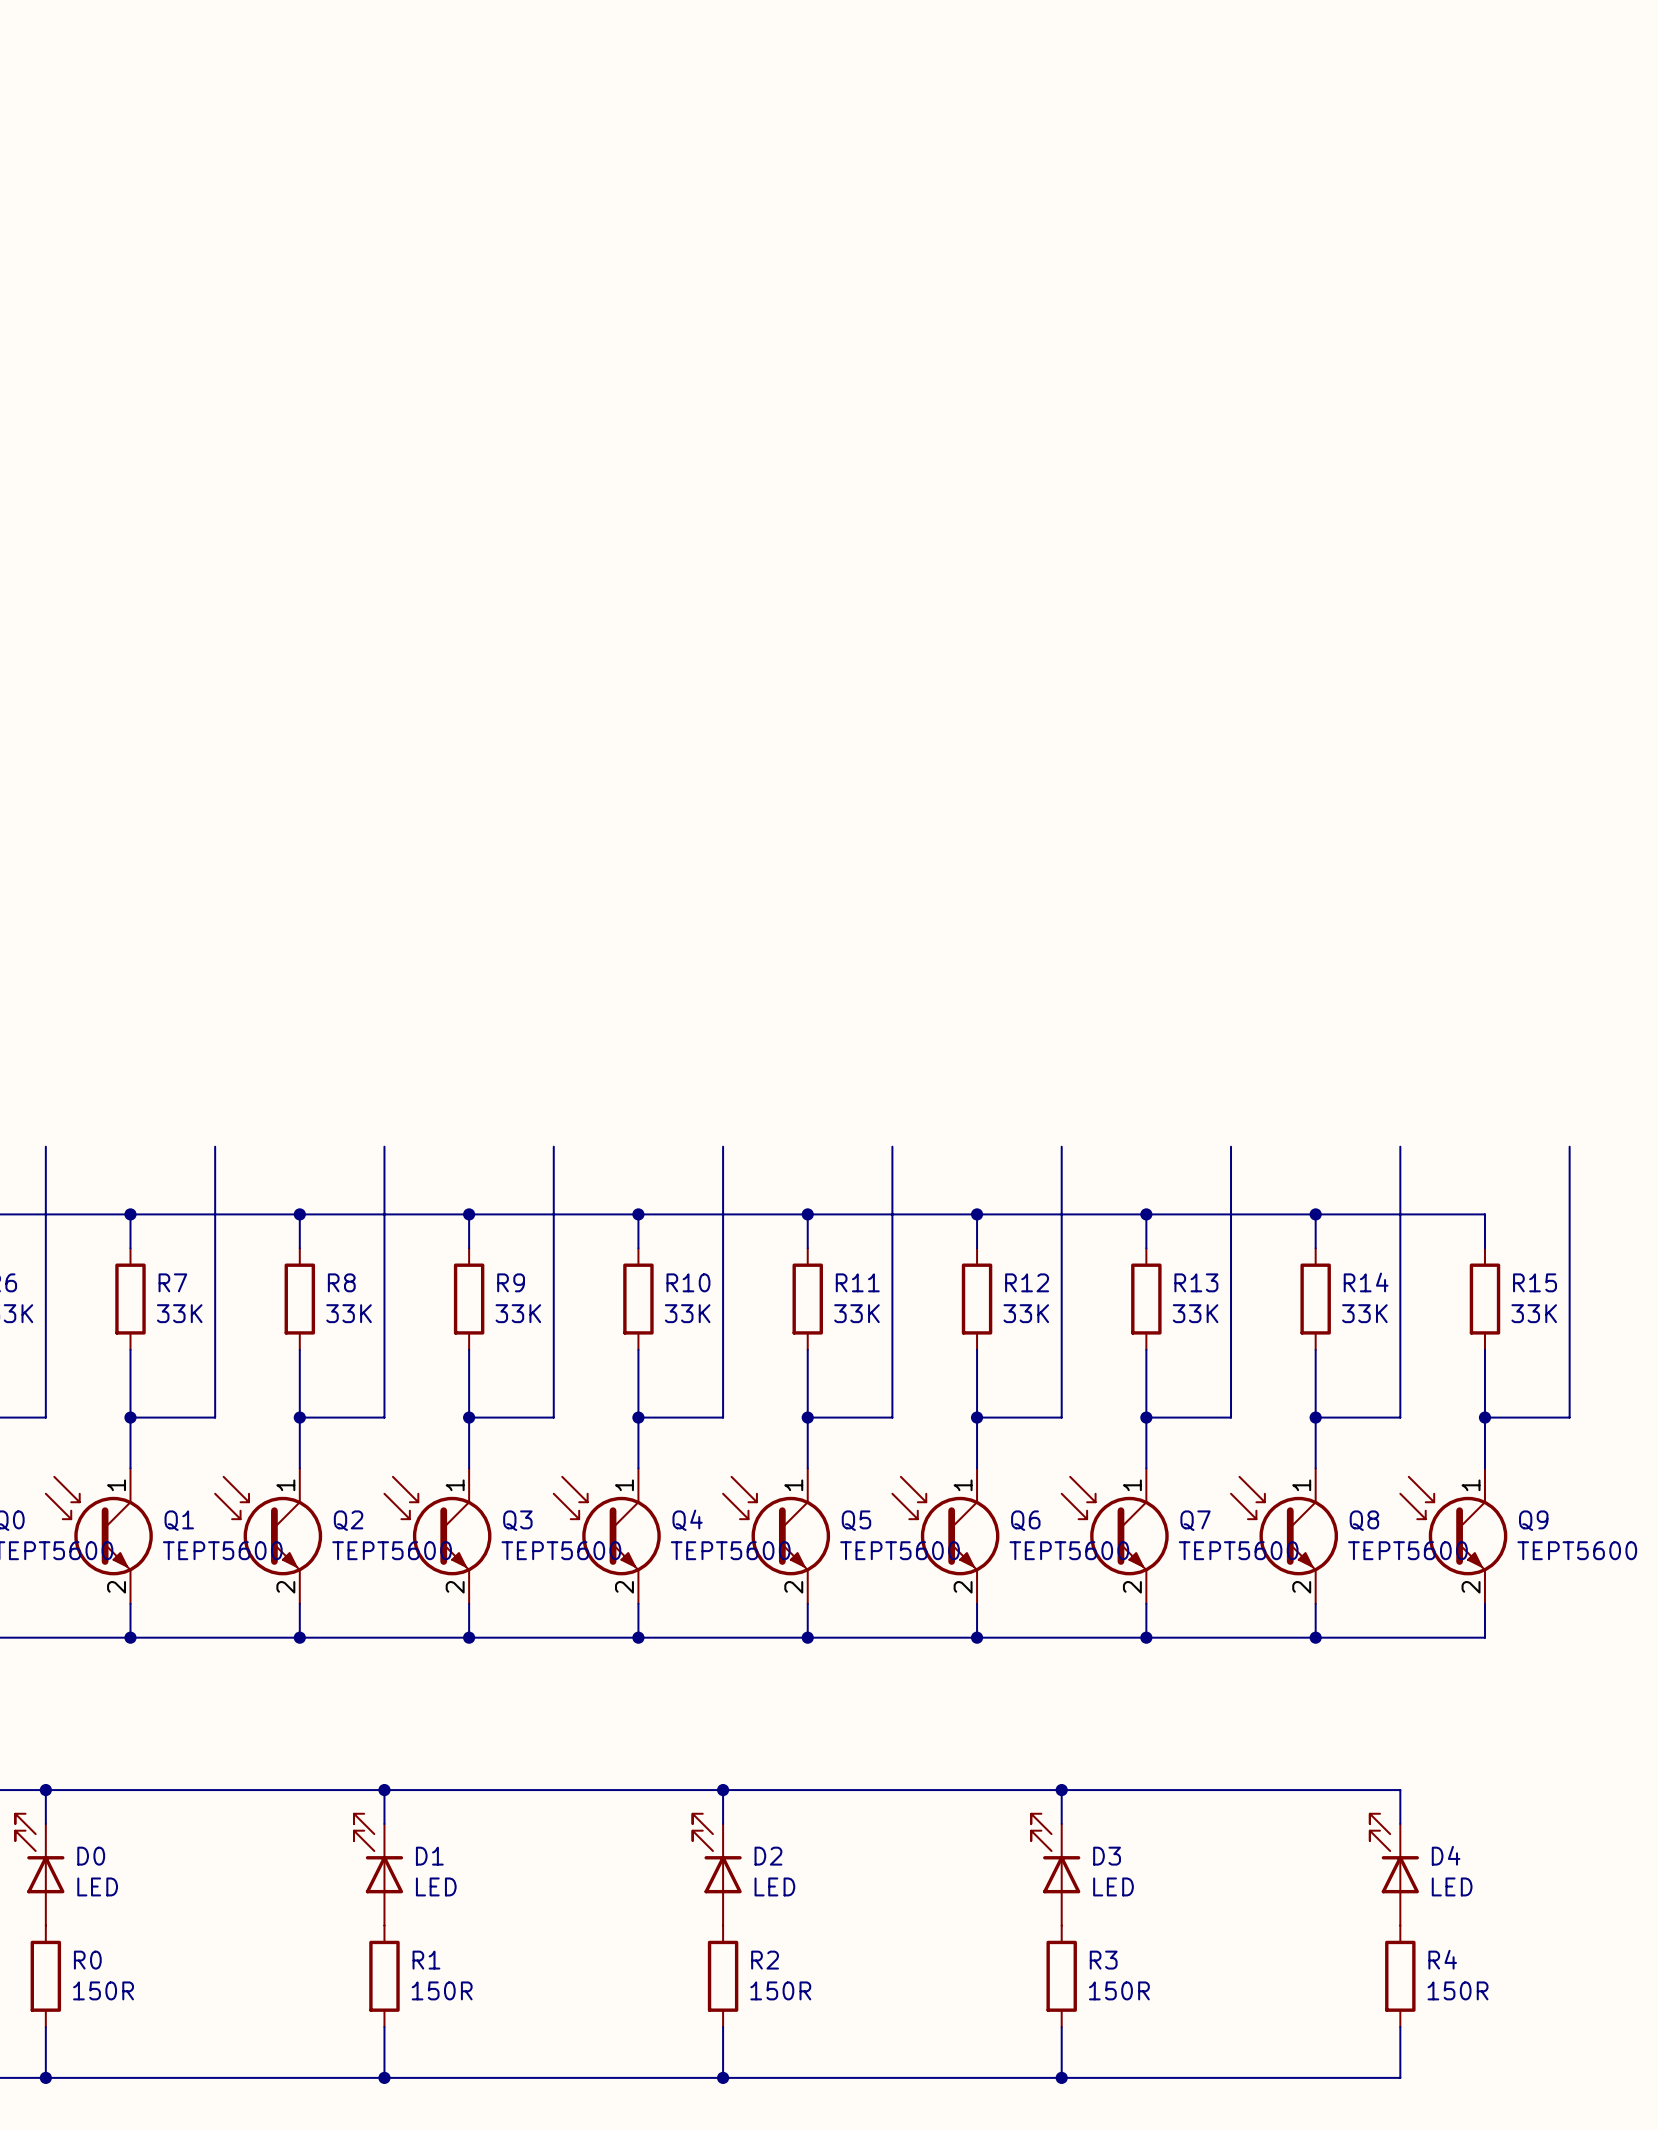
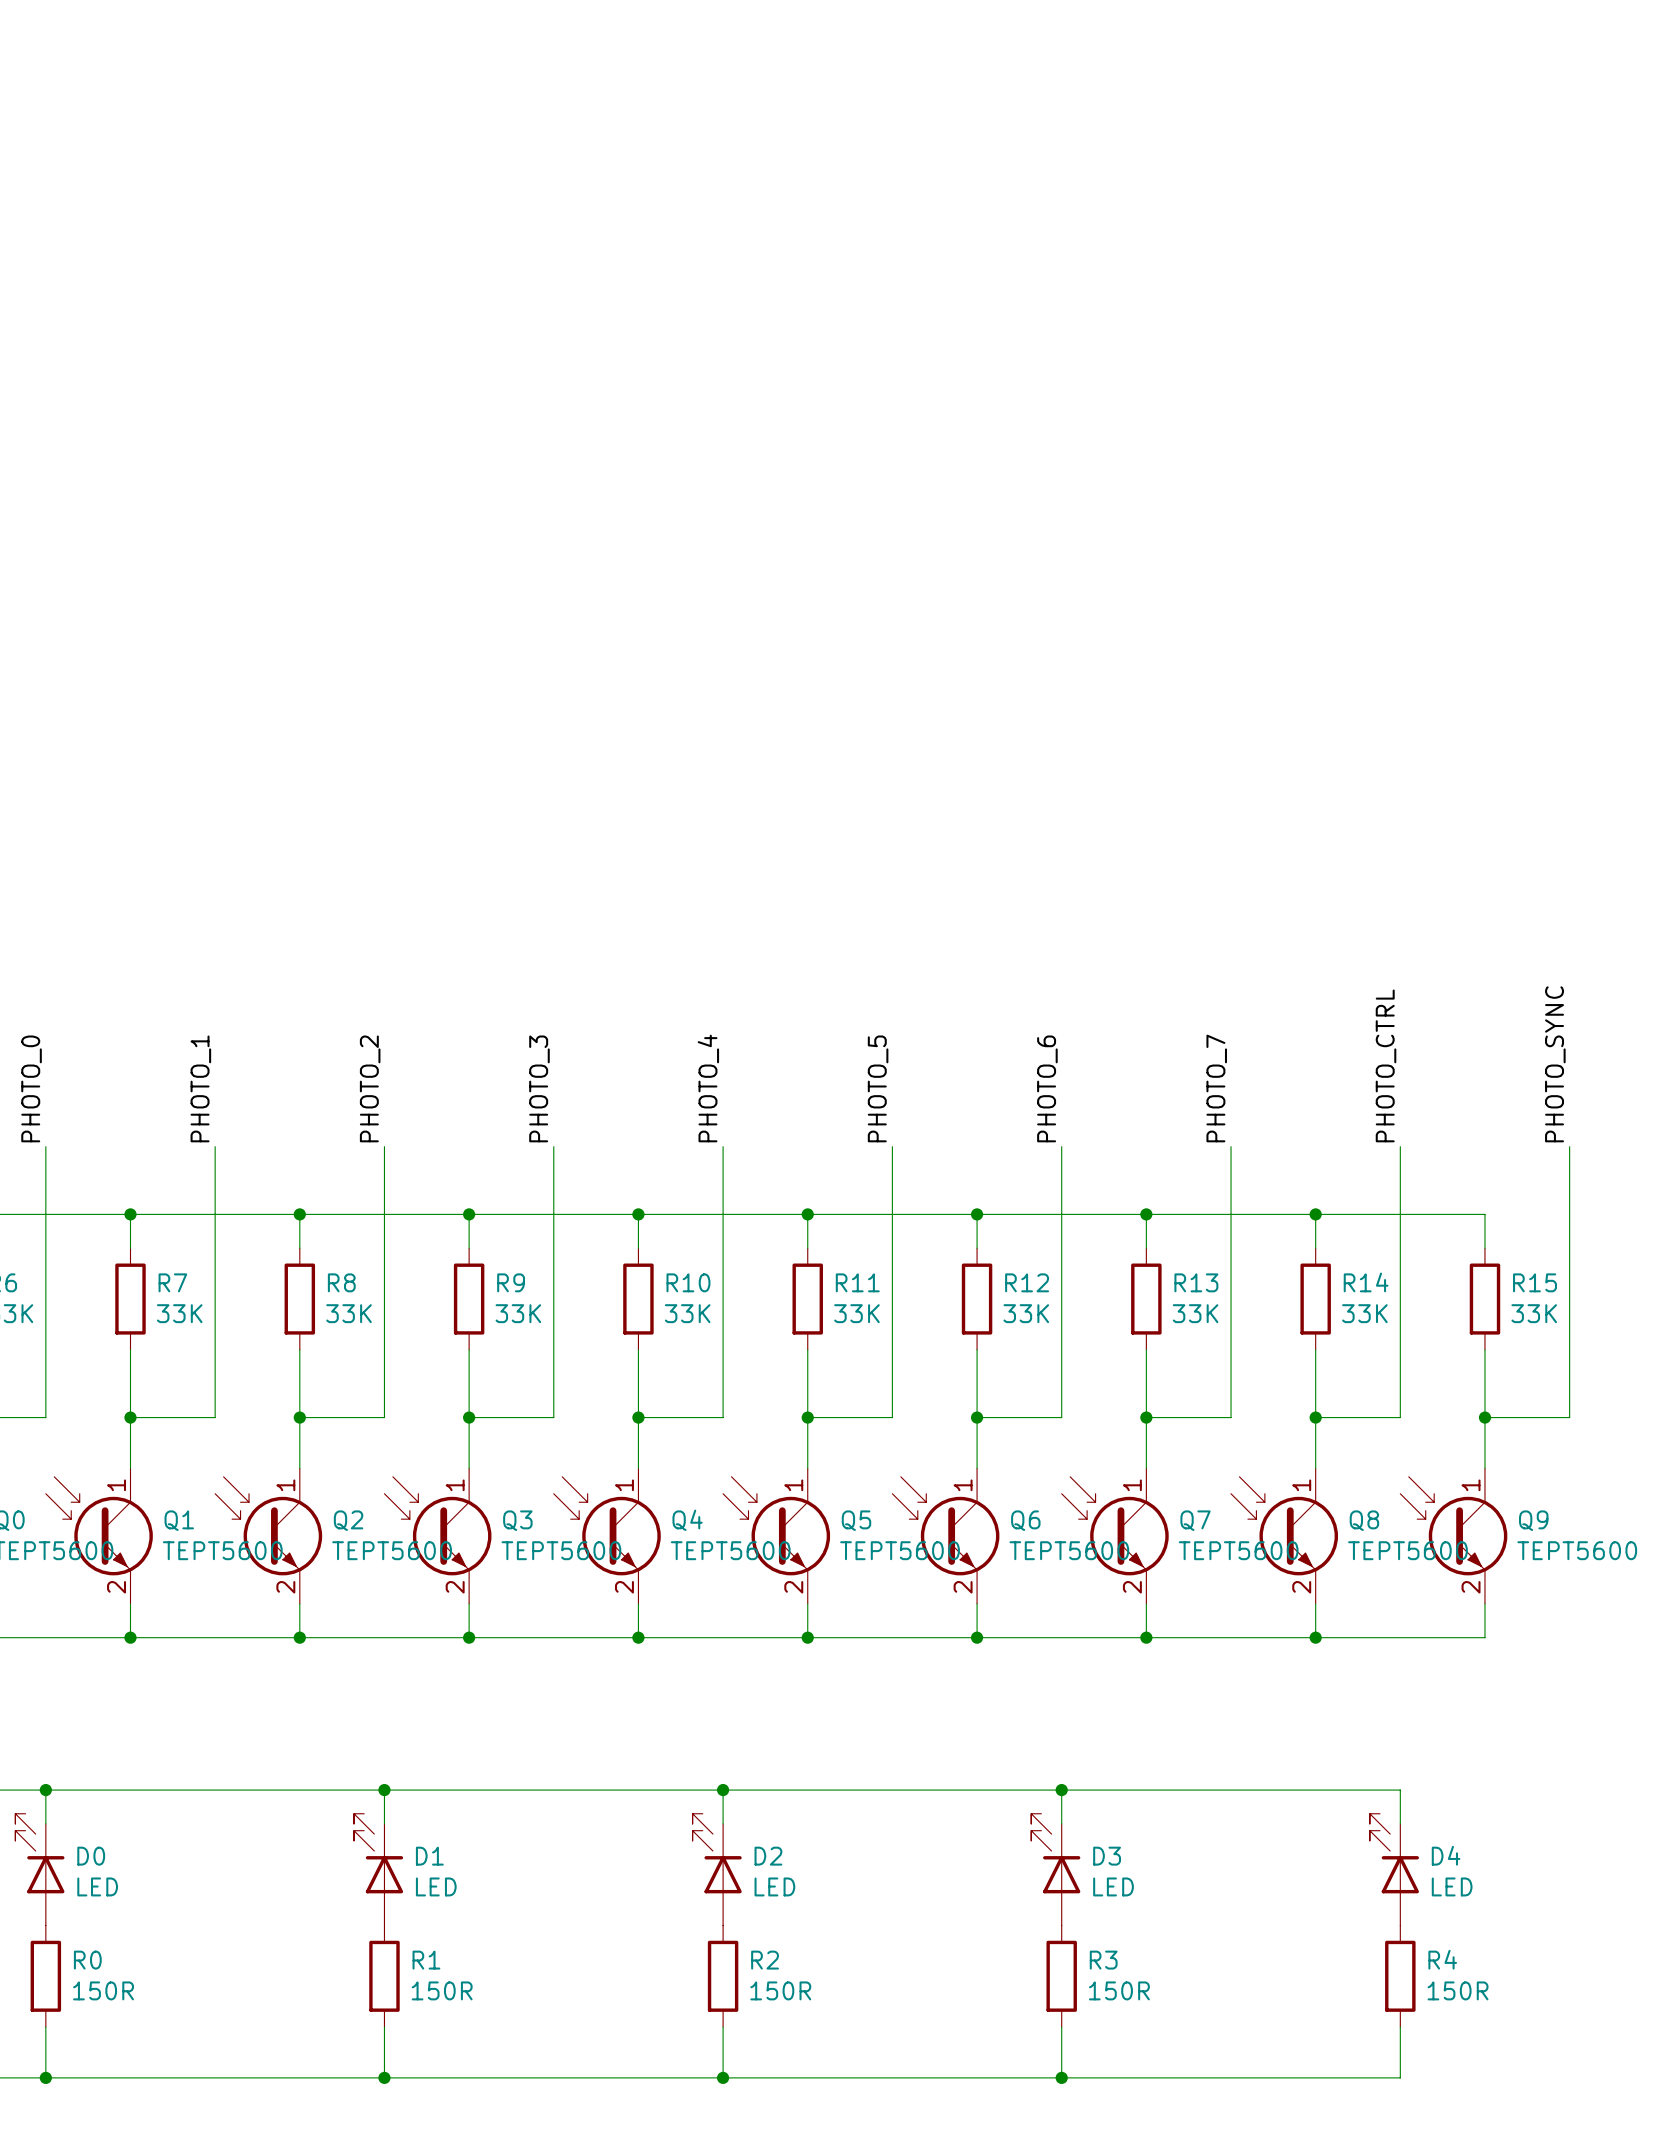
label: none -> PHOTO_SYNC (1555, 1064)
label: none -> PHOTO_CTRL (1386, 1065)
label: none -> PHOTO_0 (31, 1088)
label: none -> PHOTO_1 (200, 1088)
label: none -> PHOTO_2 (370, 1088)
label: none -> PHOTO_3 (539, 1088)
label: none -> PHOTO_4 (708, 1088)
label: none -> PHOTO_5 (878, 1088)
label: none -> PHOTO_6 (1047, 1088)
label: none -> PHOTO_7 (1216, 1088)

